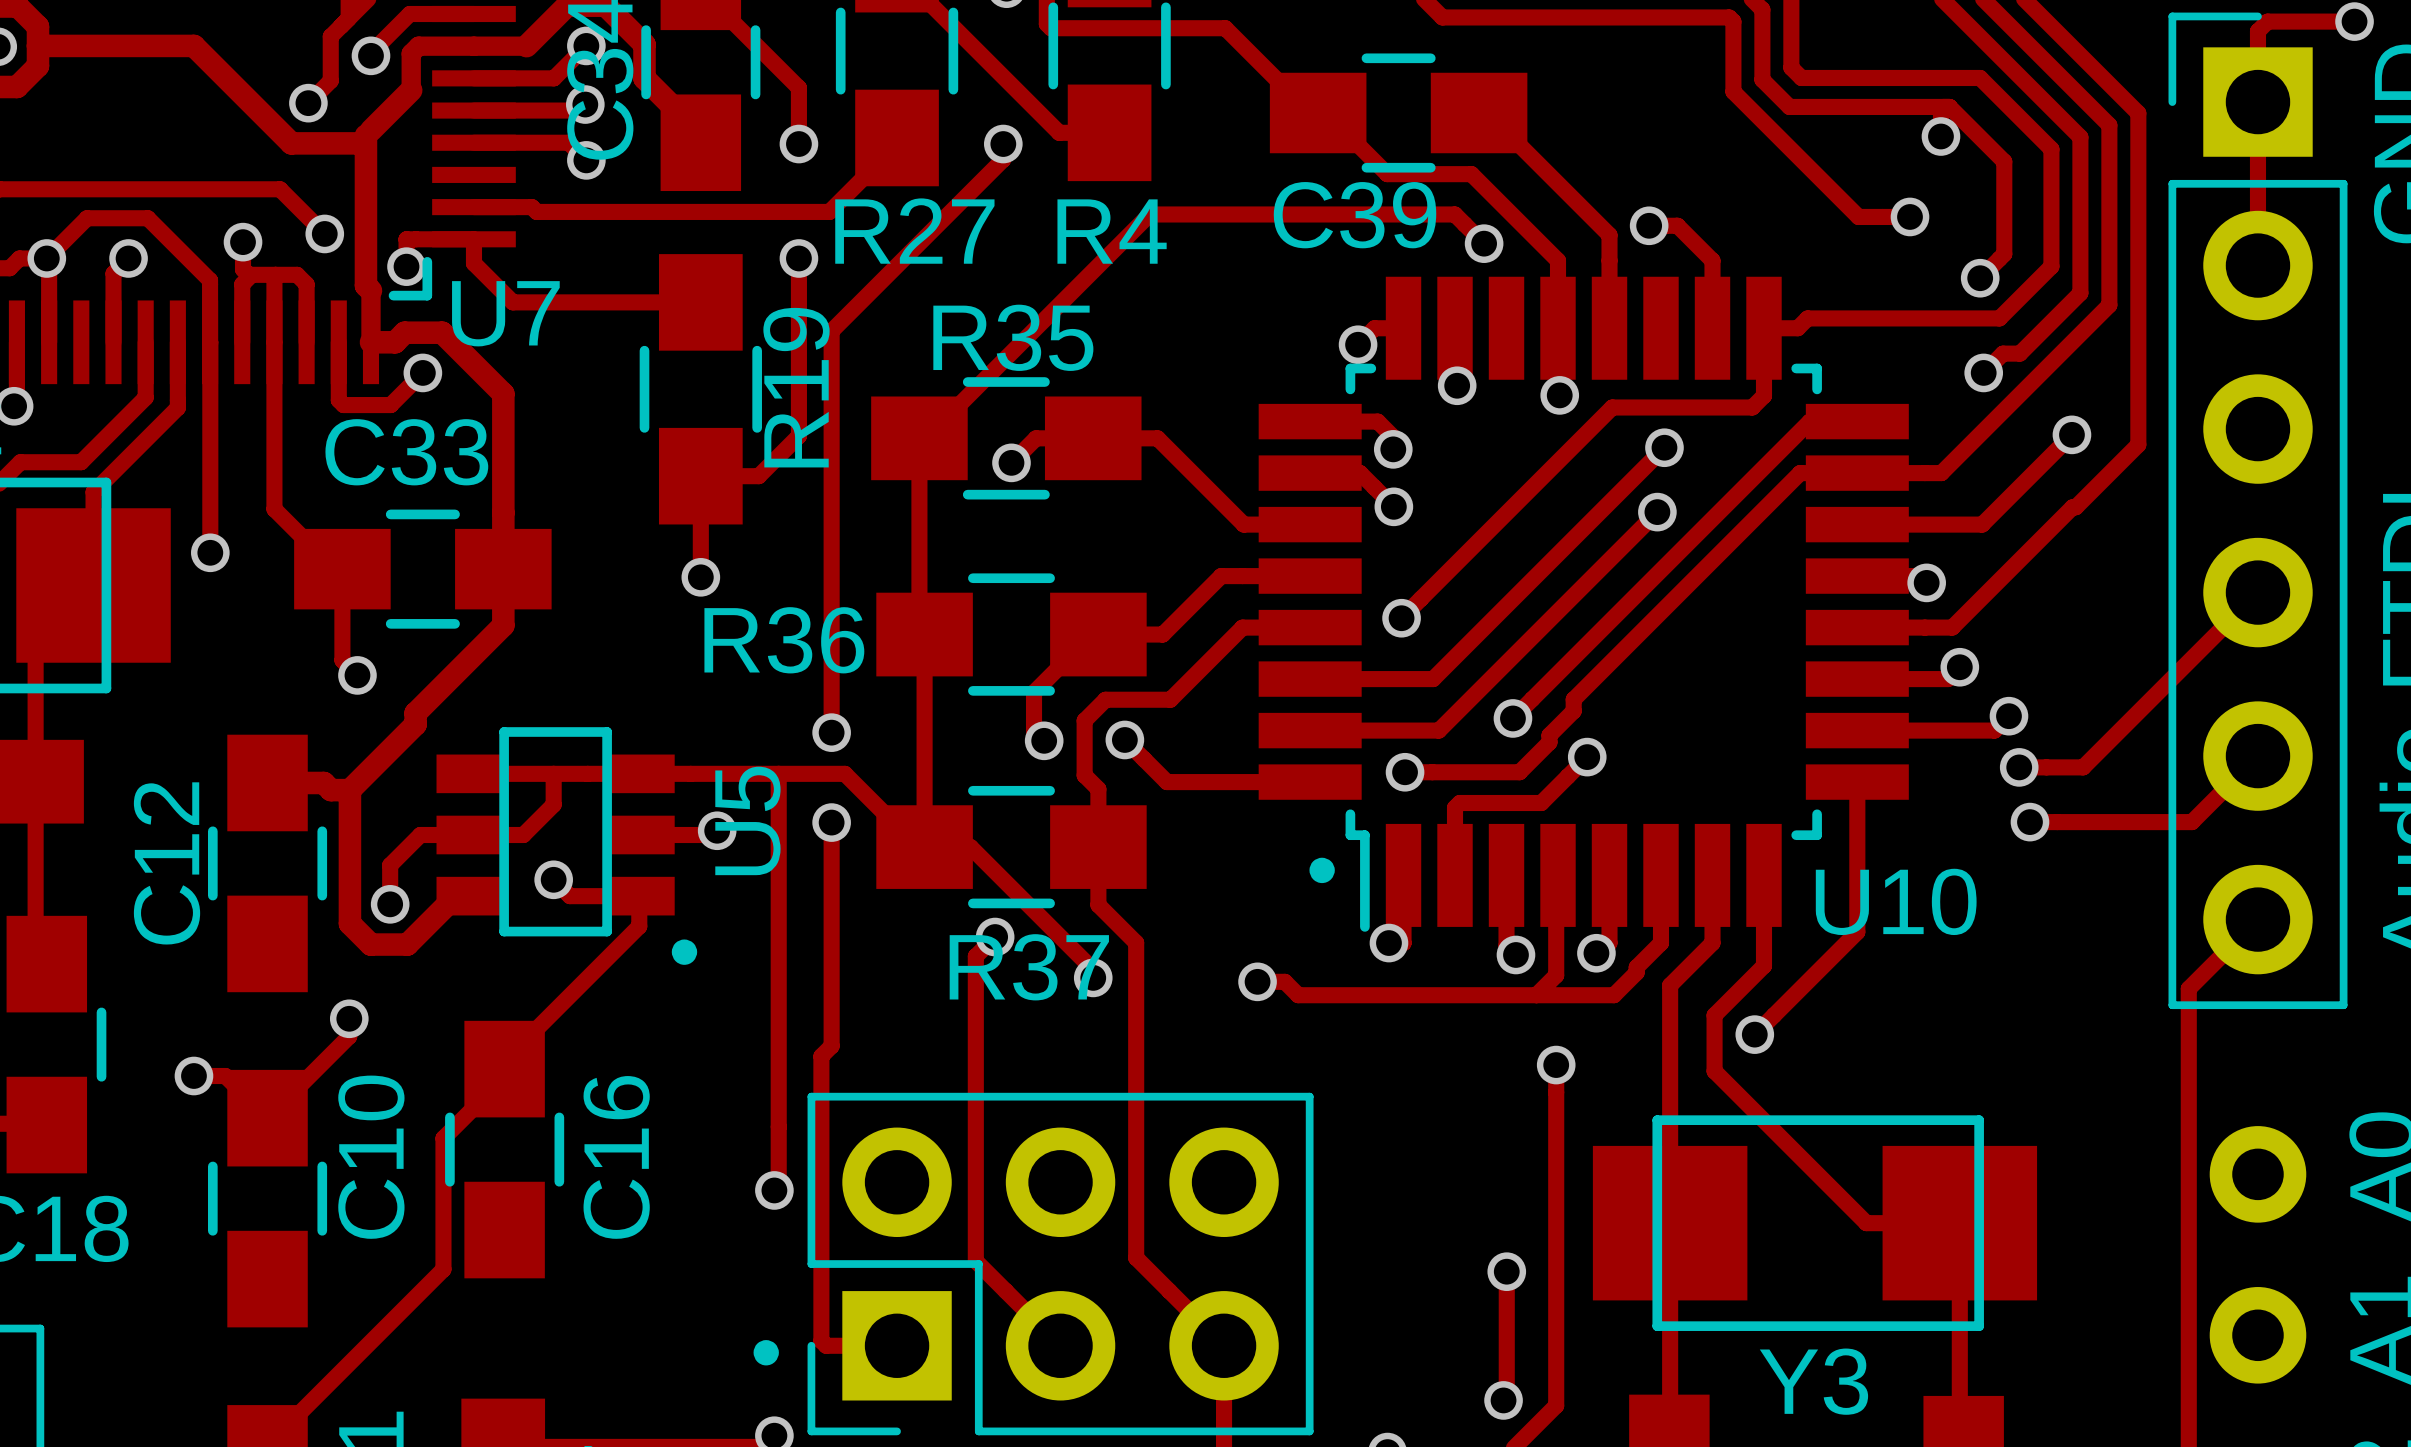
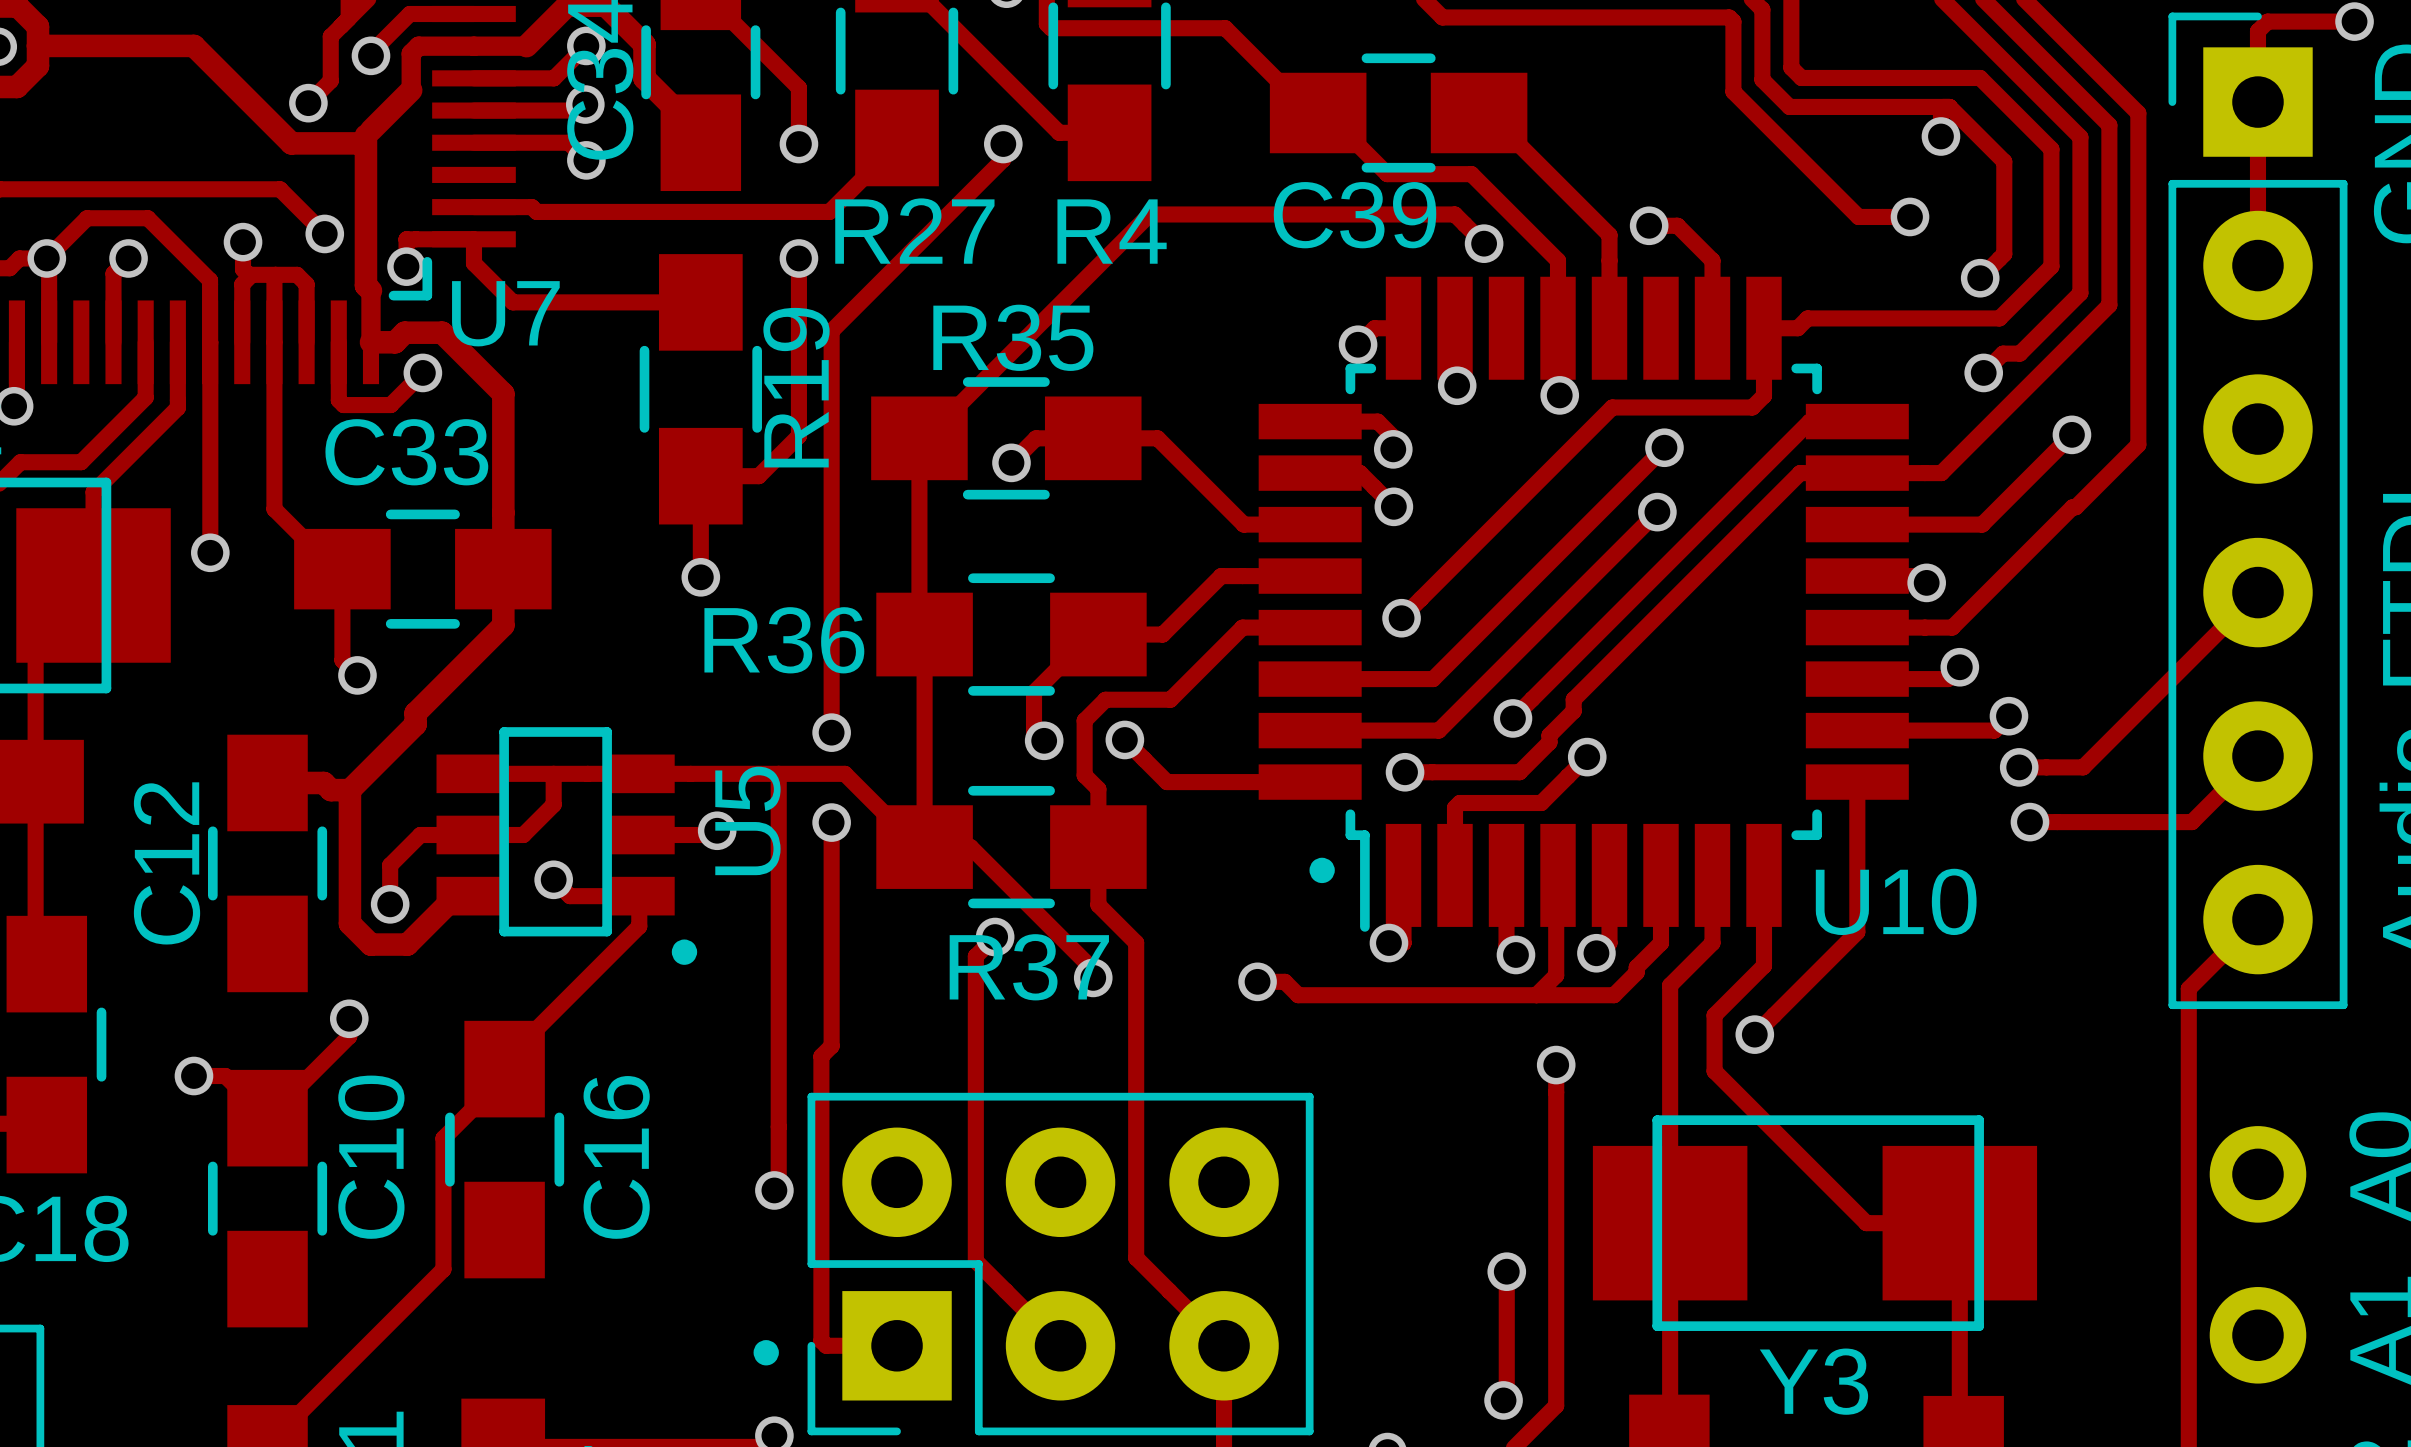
part footprint: [2168, 12, 2348, 1010] -> [2168, 12, 2348, 1010]
part footprint: [807, 1092, 1314, 1436] -> [807, 1092, 1314, 1436]

